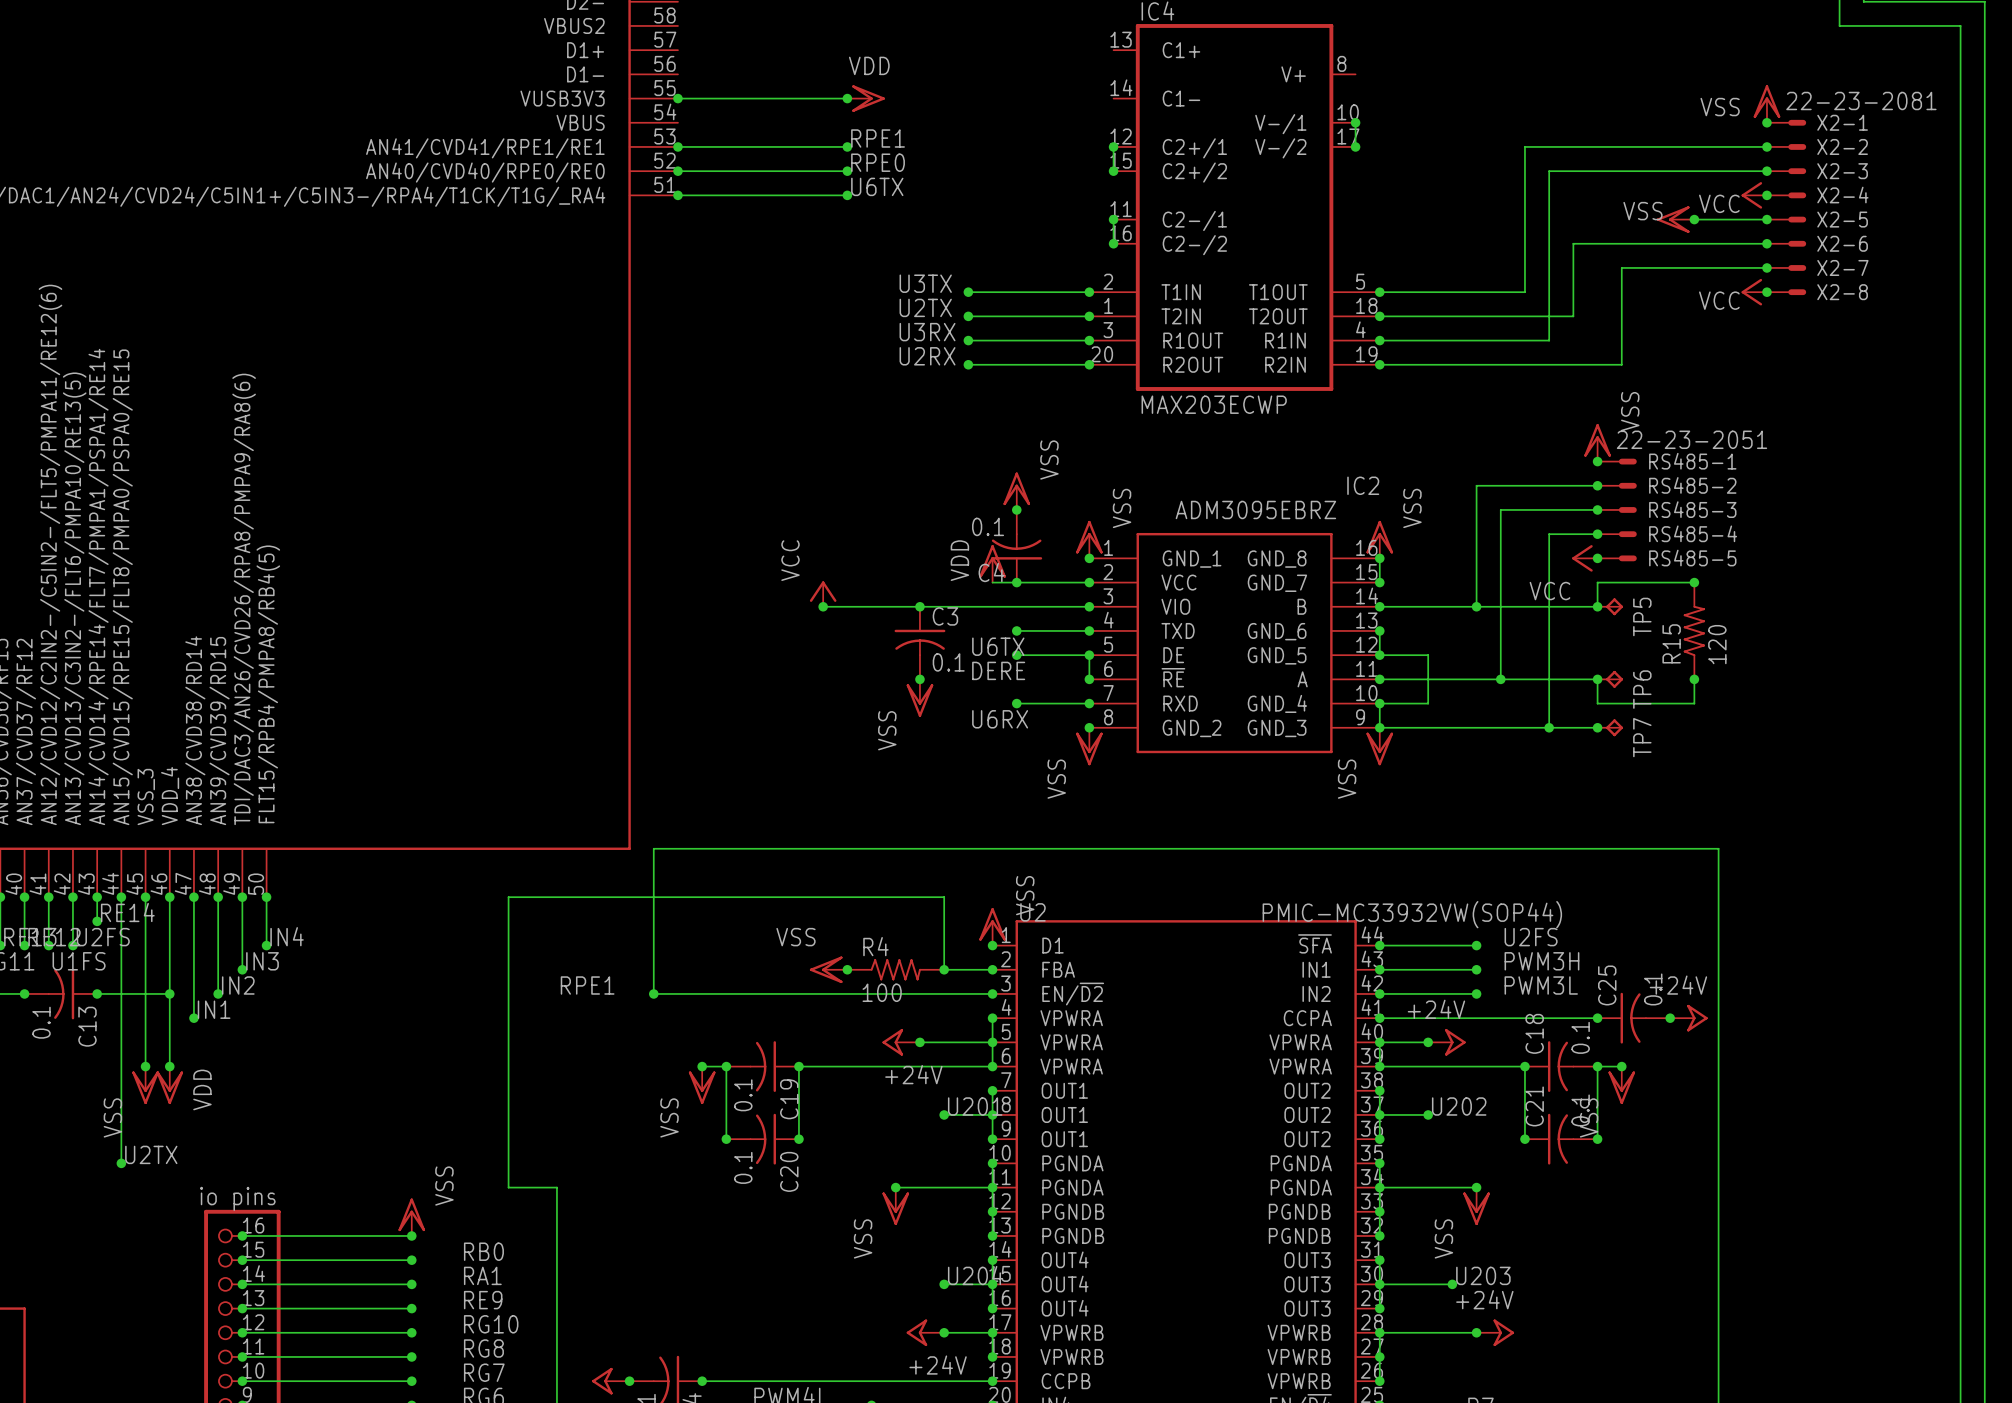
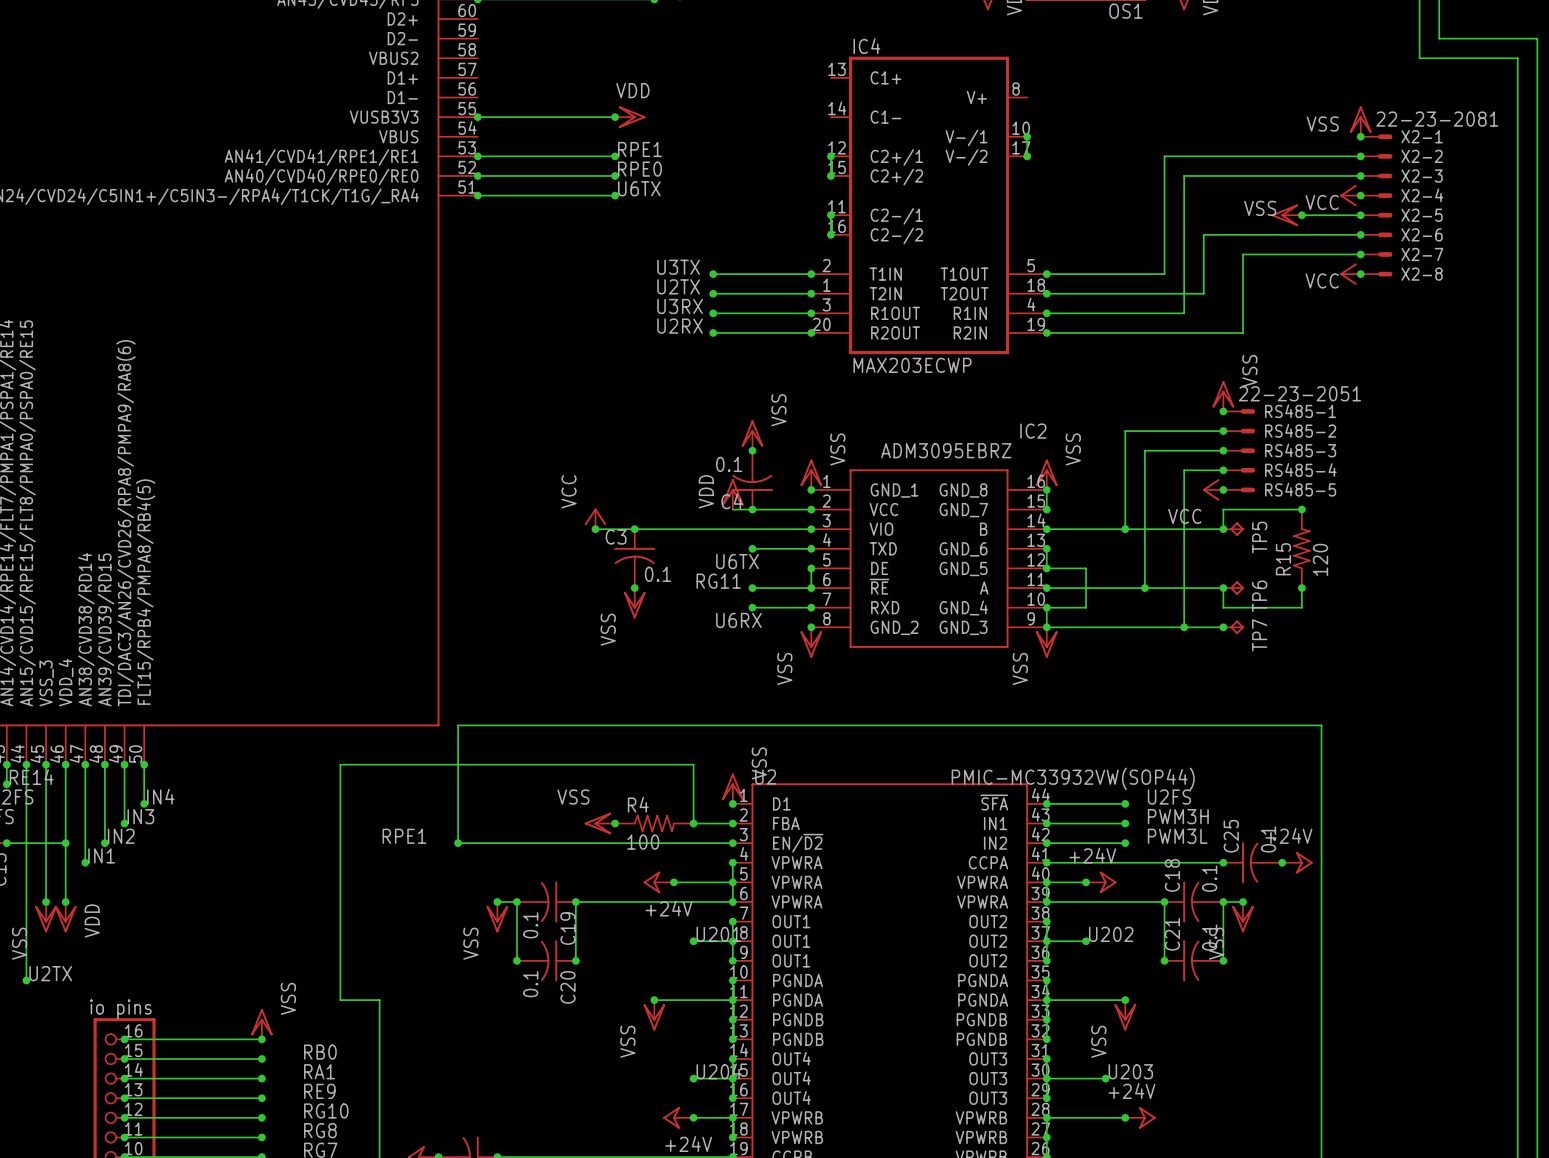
junction: none -> (634, 529)
junction: (919, 606) -> none
C3 name position: C3 (945, 616) -> C3 (616, 537)
C3 position: (919, 643) -> (634, 558)
wire: (1016, 655) (1089, 655) -> (752, 588) (811, 588)
junction position: (1016, 655) -> (752, 588)
label: none -> RG11 (718, 581)
label: DERE (998, 670) -> none
junction: none -> (634, 588)
junction: (919, 679) -> none
power symbol position: VSS (919, 698) -> VSS (634, 603)

